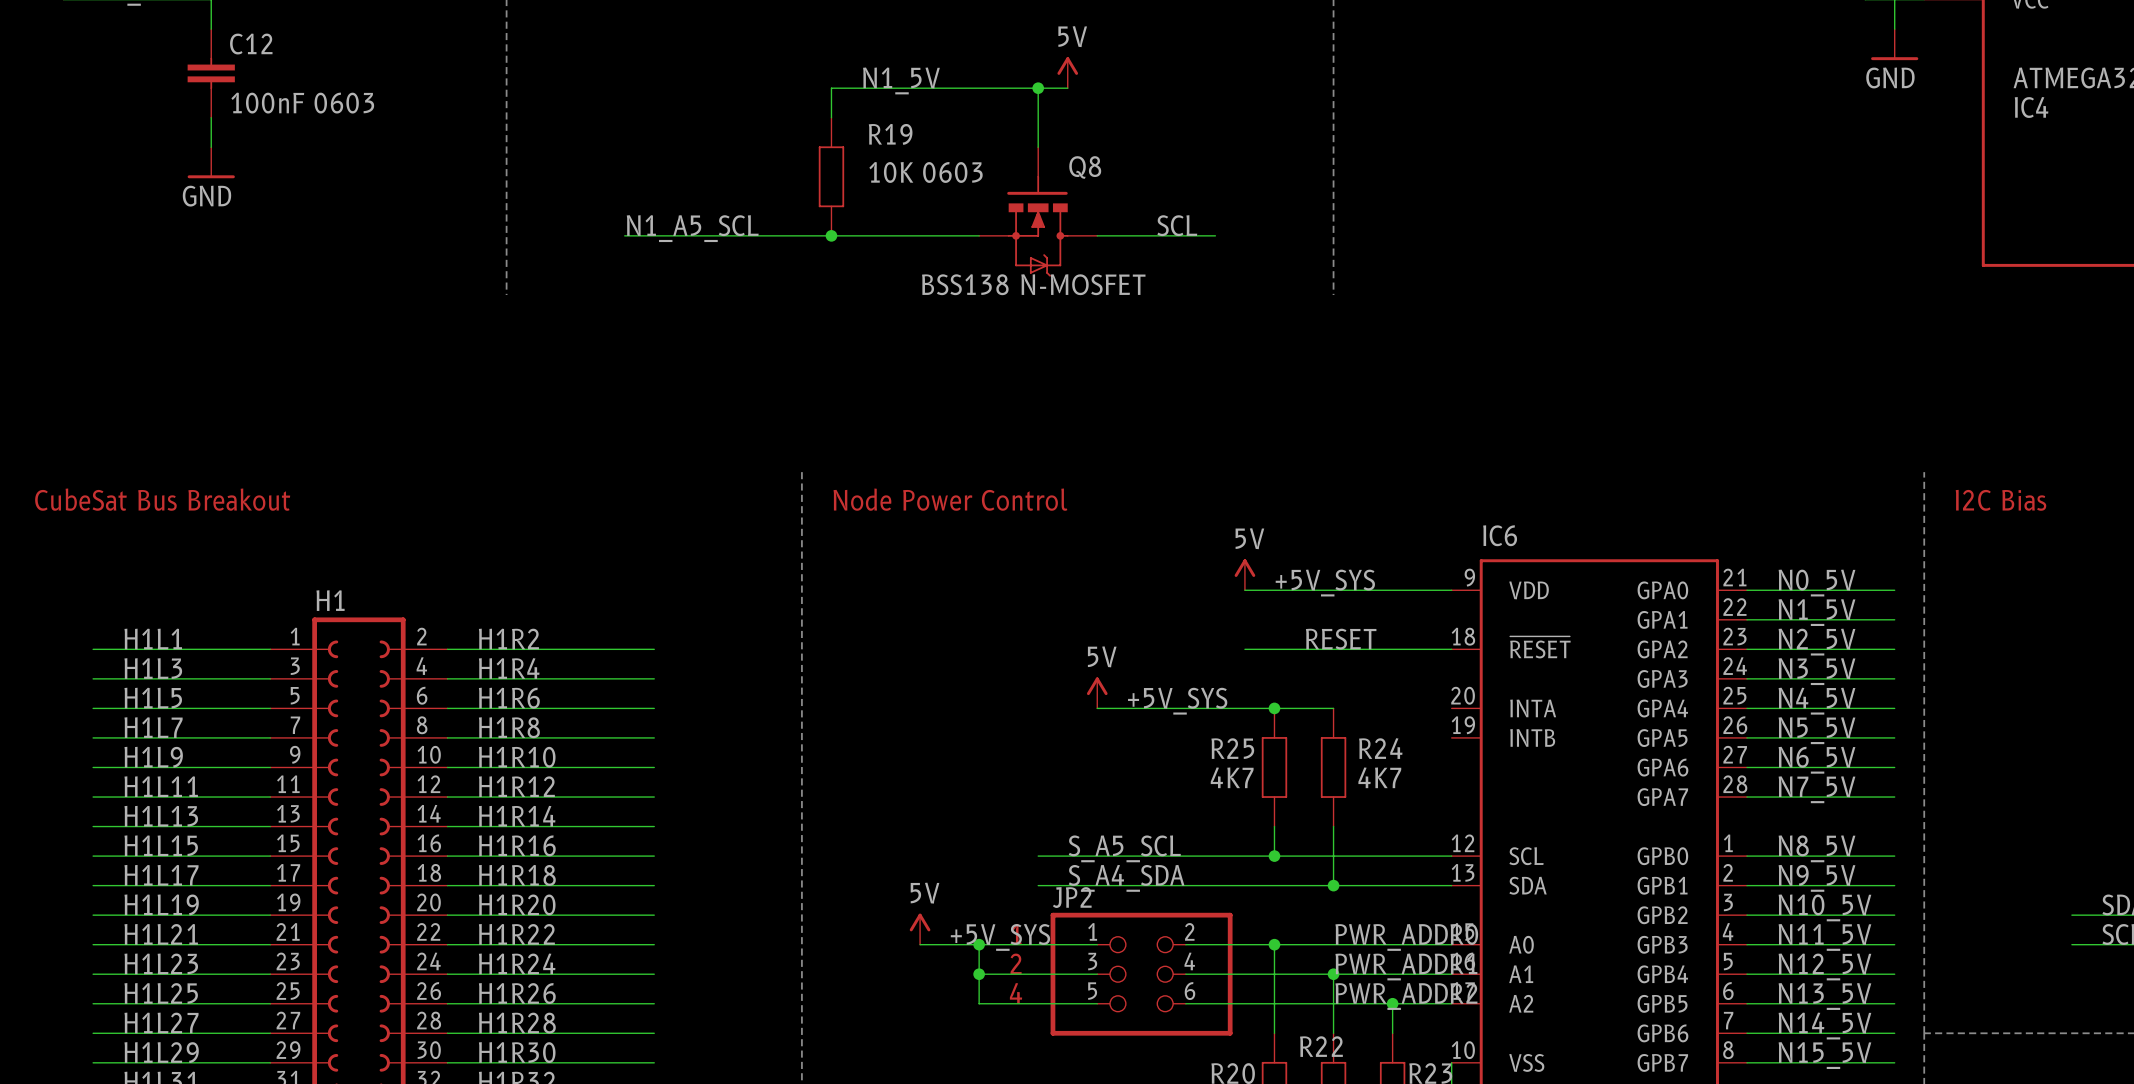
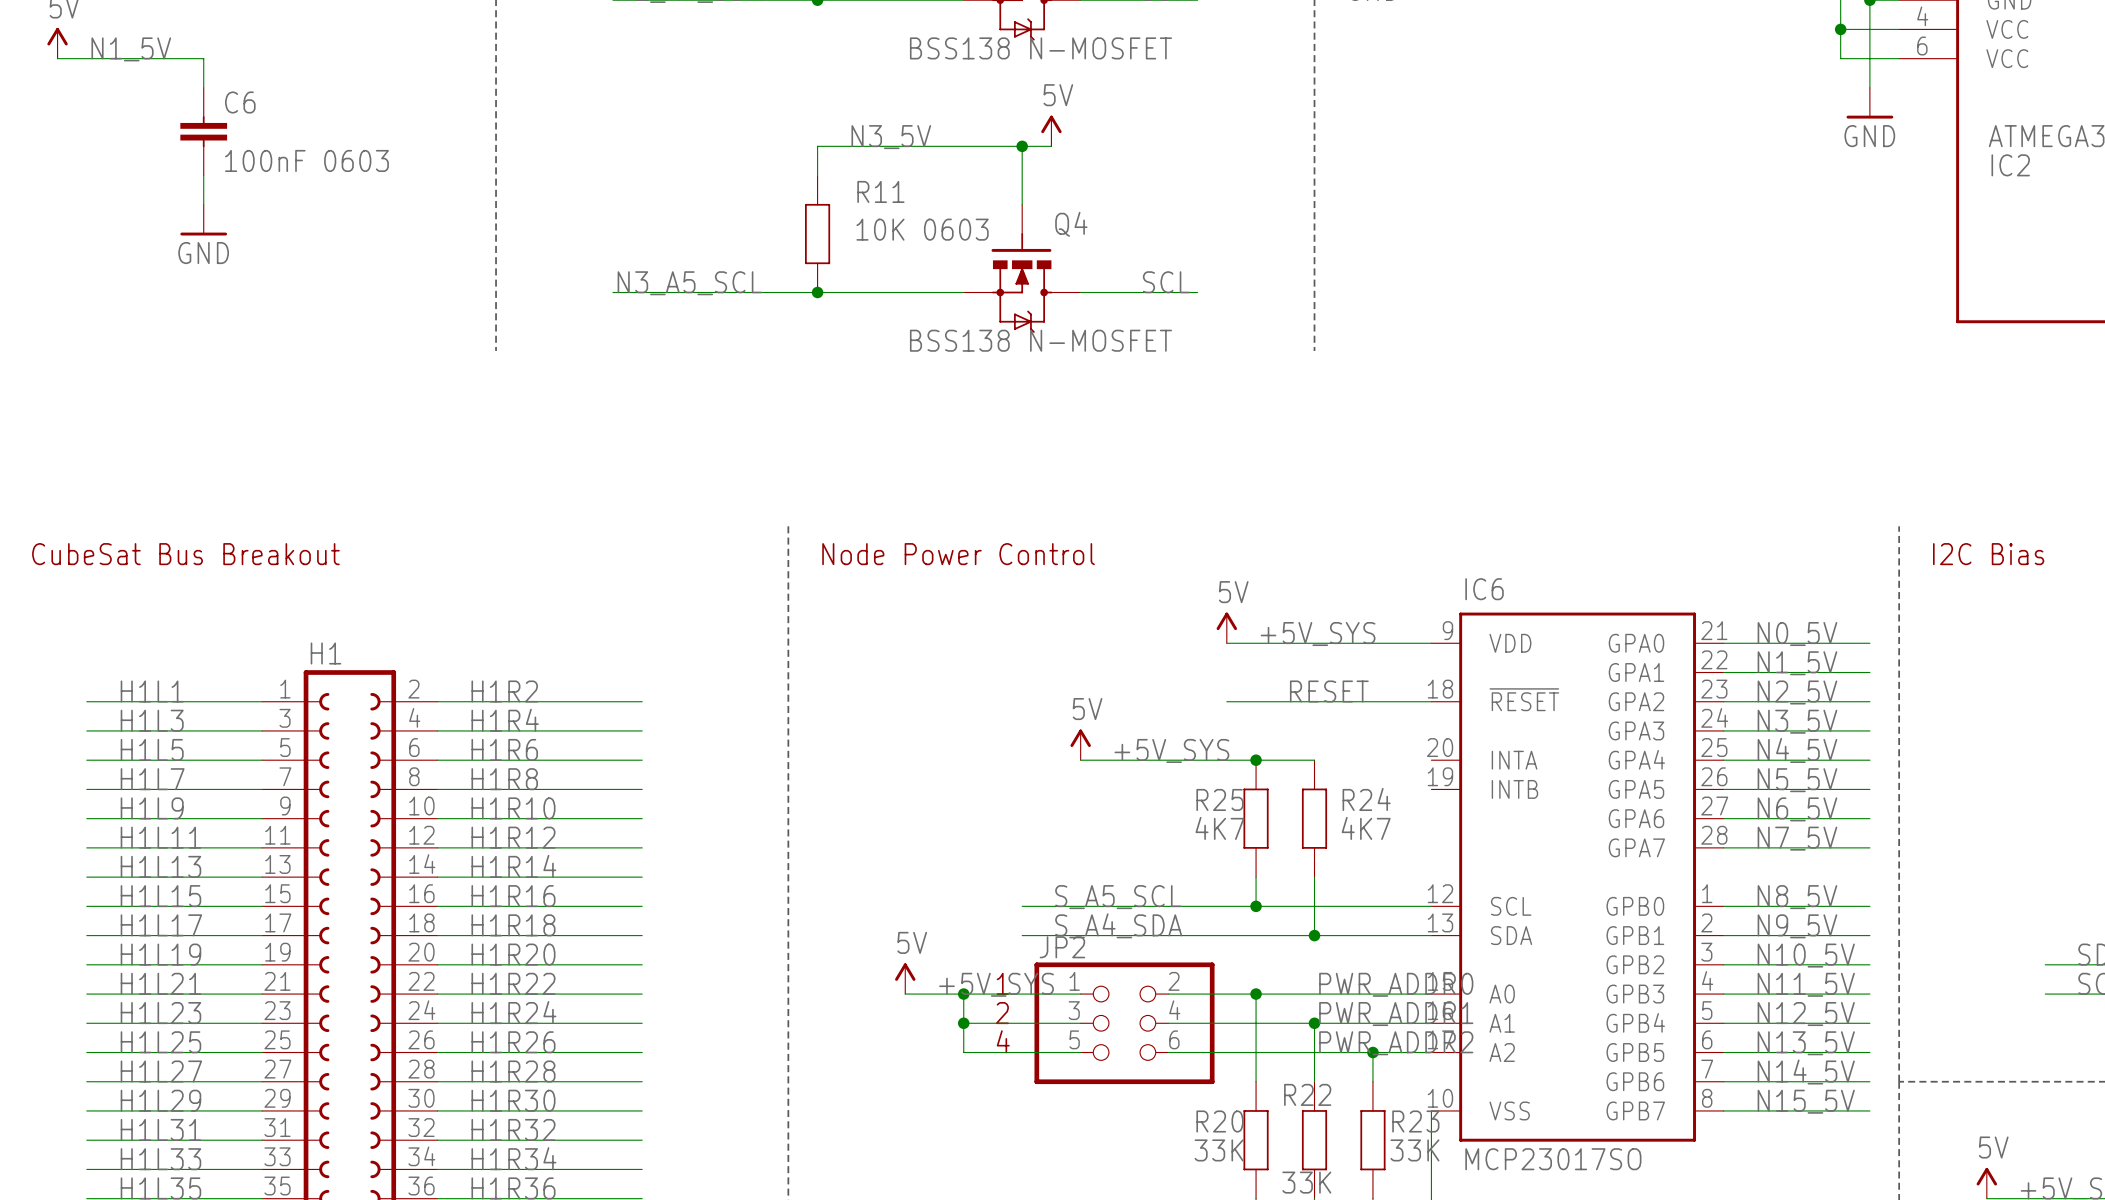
C12 name: C12 (251, 44) -> C6 (240, 102)
label: N1_5V (901, 80) -> N3_5V (891, 137)
IC4 name: IC4 (2031, 107) -> IC2 (2010, 165)
R19 name: R19 (890, 134) -> R11 (880, 191)
Q8 name: Q8 (1085, 167) -> Q4 (1071, 224)
label: N1_A5_SCL (692, 228) -> N3_A5_SCL (689, 283)

